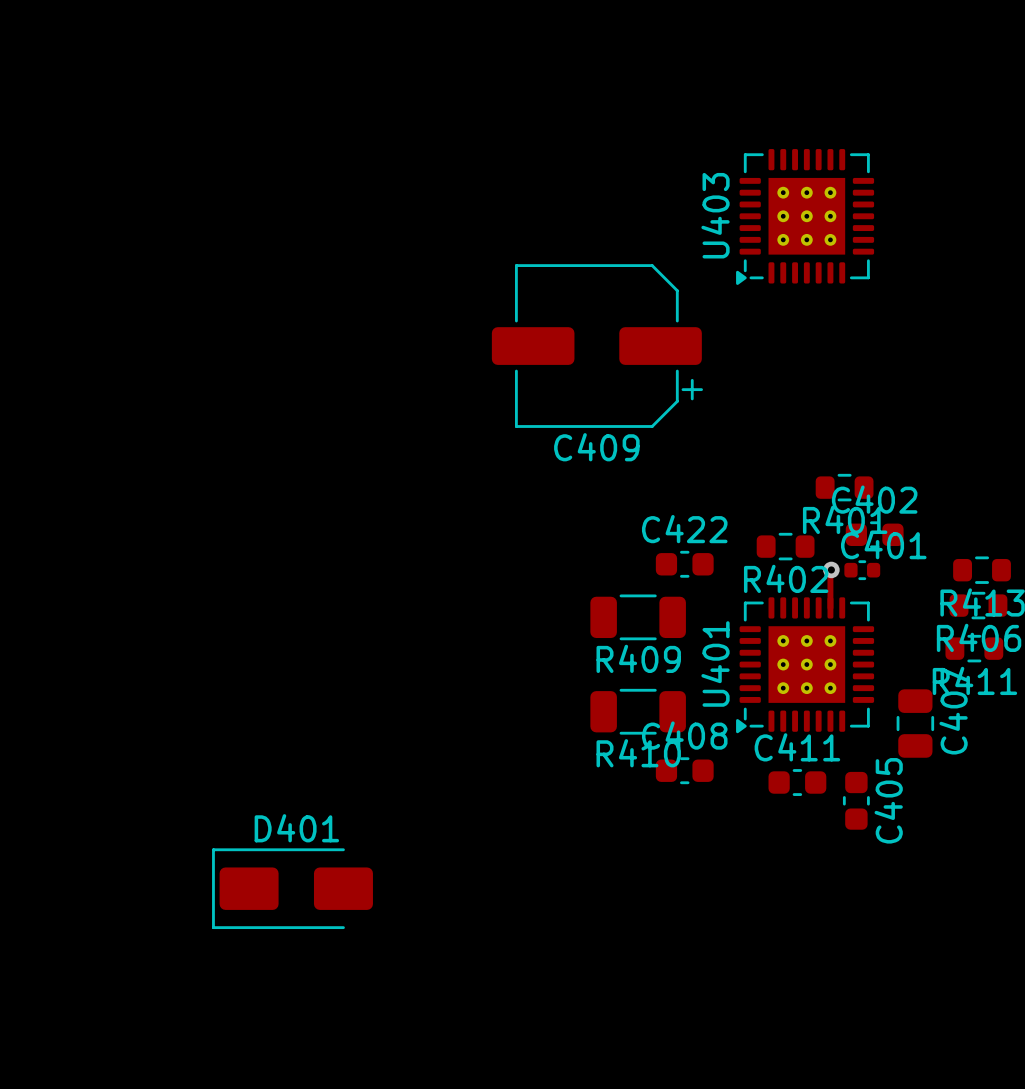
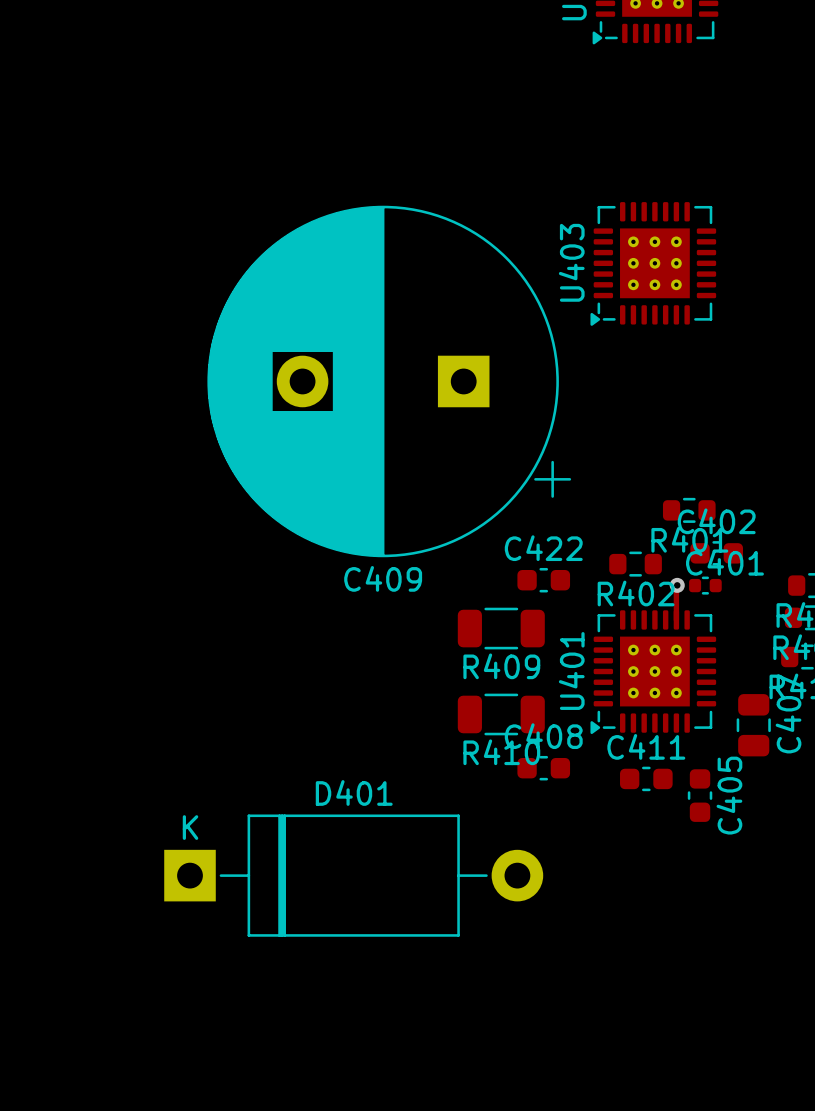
C409 footprint: [491, 264, 703, 428] -> [207, 205, 572, 558]
C409 name position: C409 (596, 447) -> C409 (383, 578)
D401 footprint: [212, 848, 373, 930] -> [164, 814, 544, 937]

